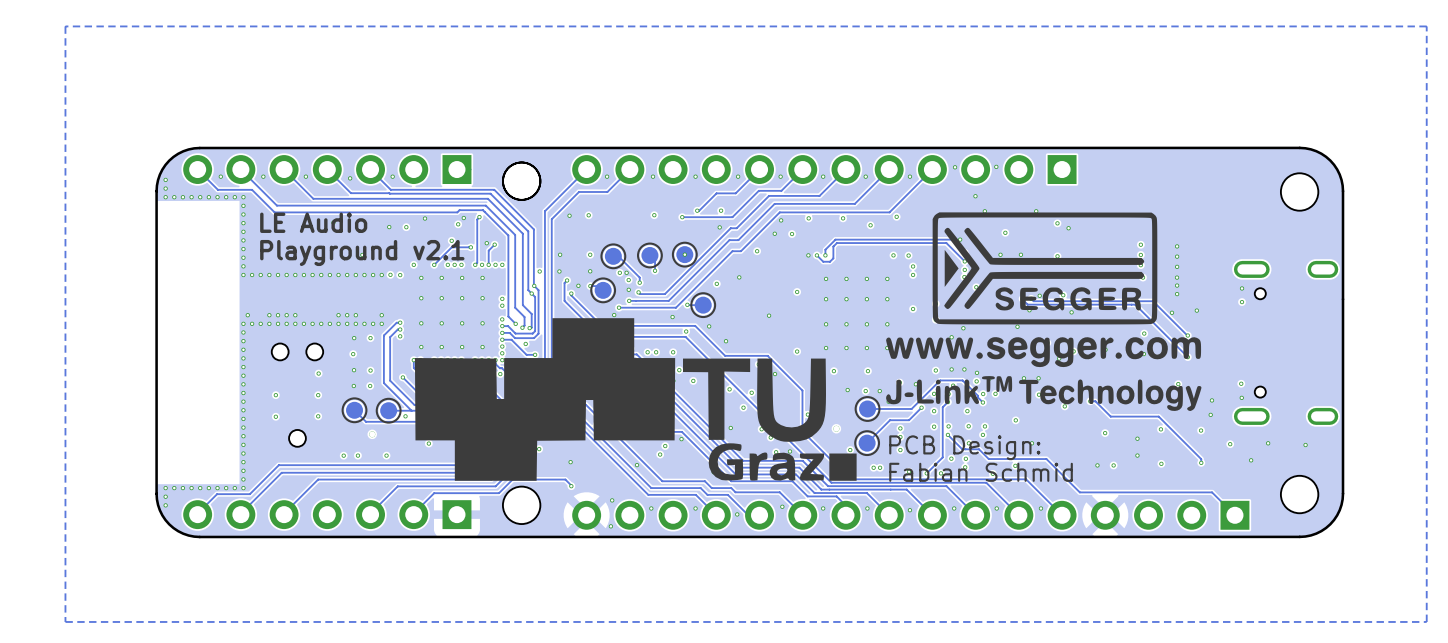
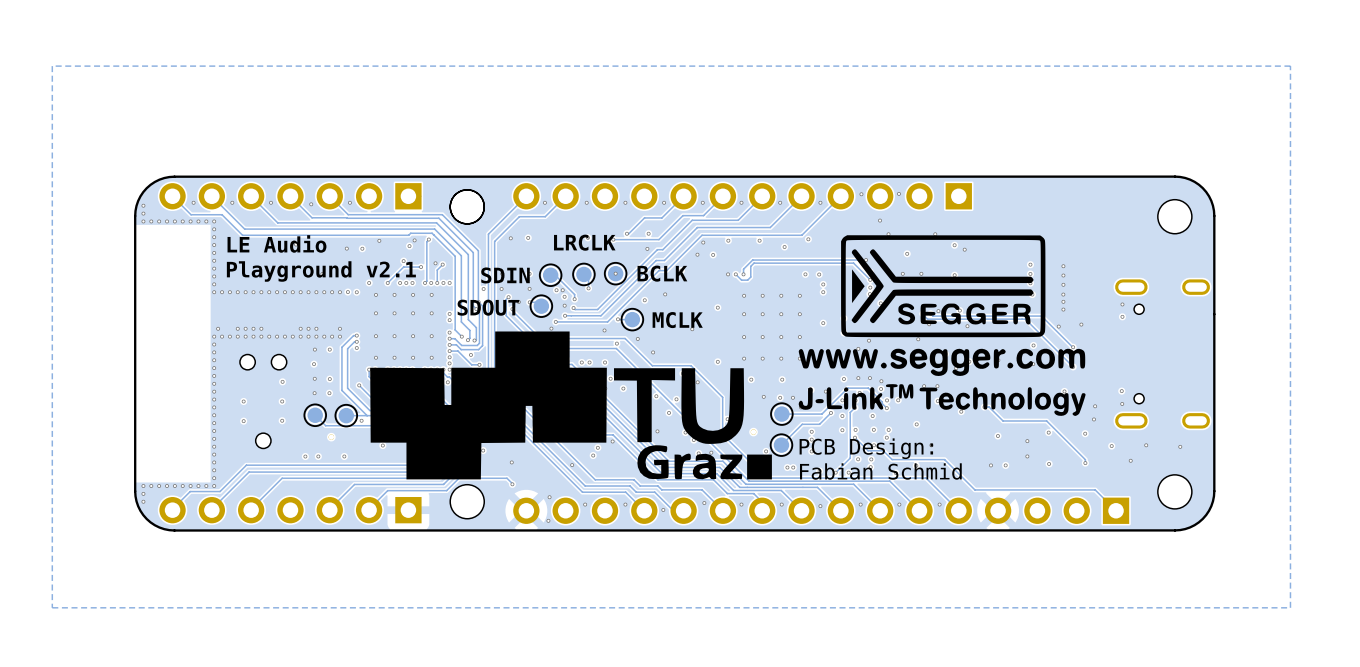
text: none -> LRCLK (584, 242)
text: none -> BCLK (662, 273)
text: none -> SDIN (505, 275)
text: none -> SDOUT (488, 307)
text: none -> MCLK (677, 320)

